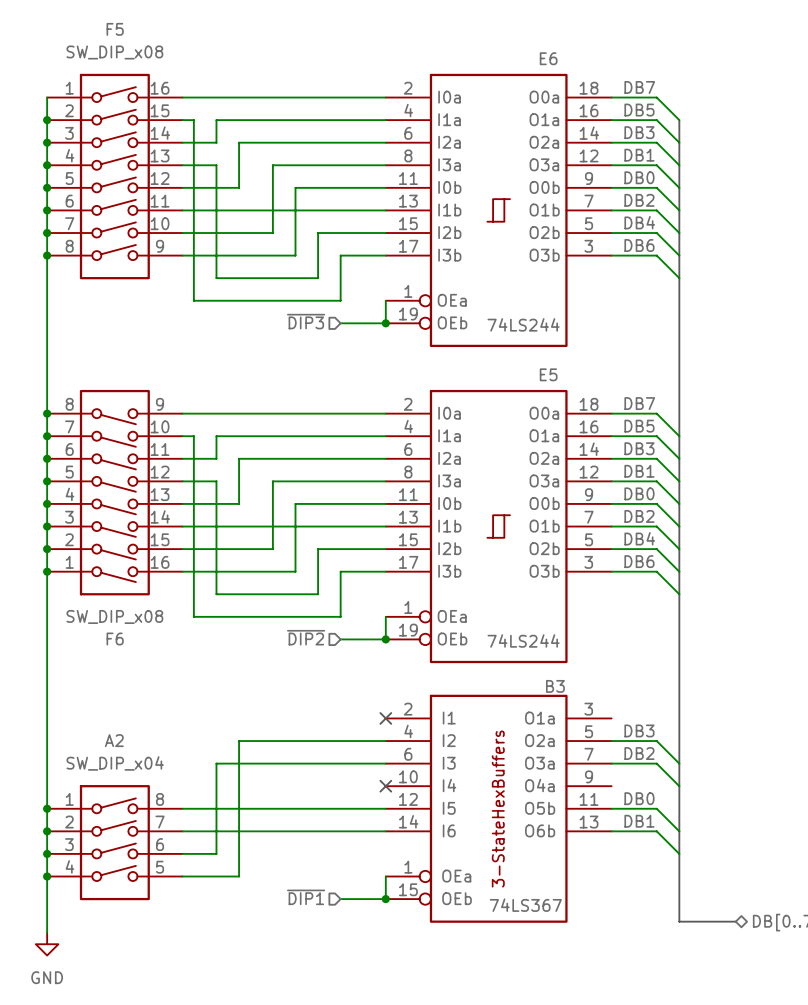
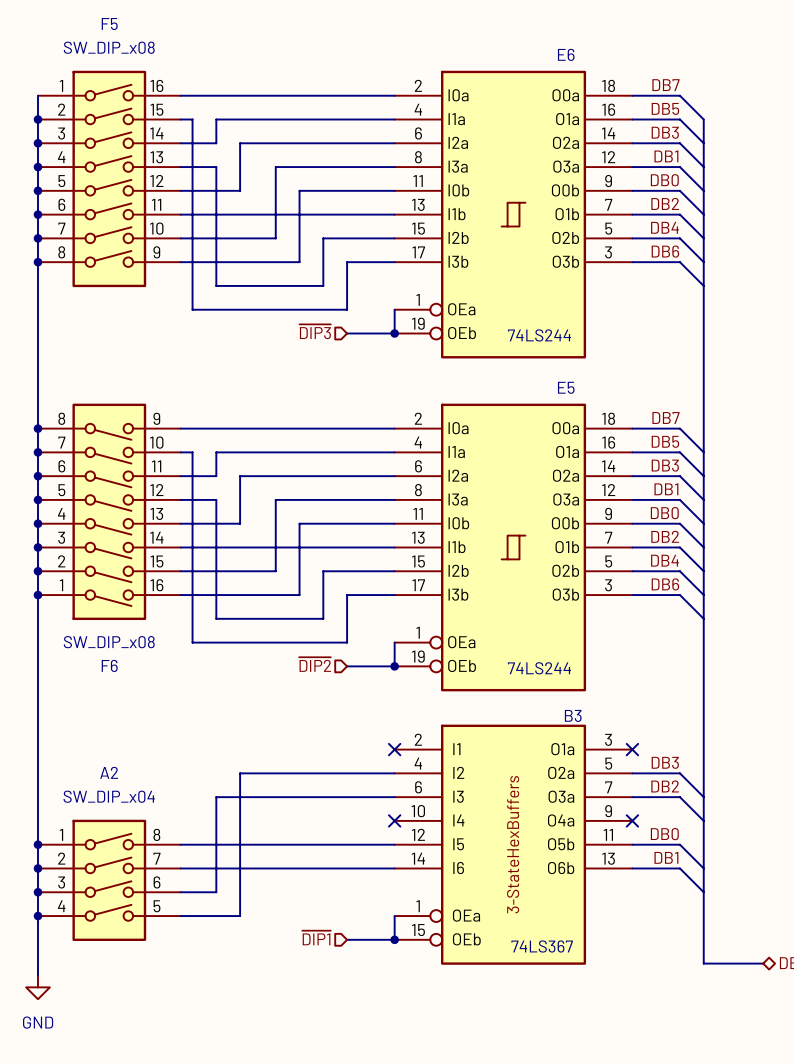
no-connect mark: none -> (632, 749)
no-connect mark: none -> (632, 820)

